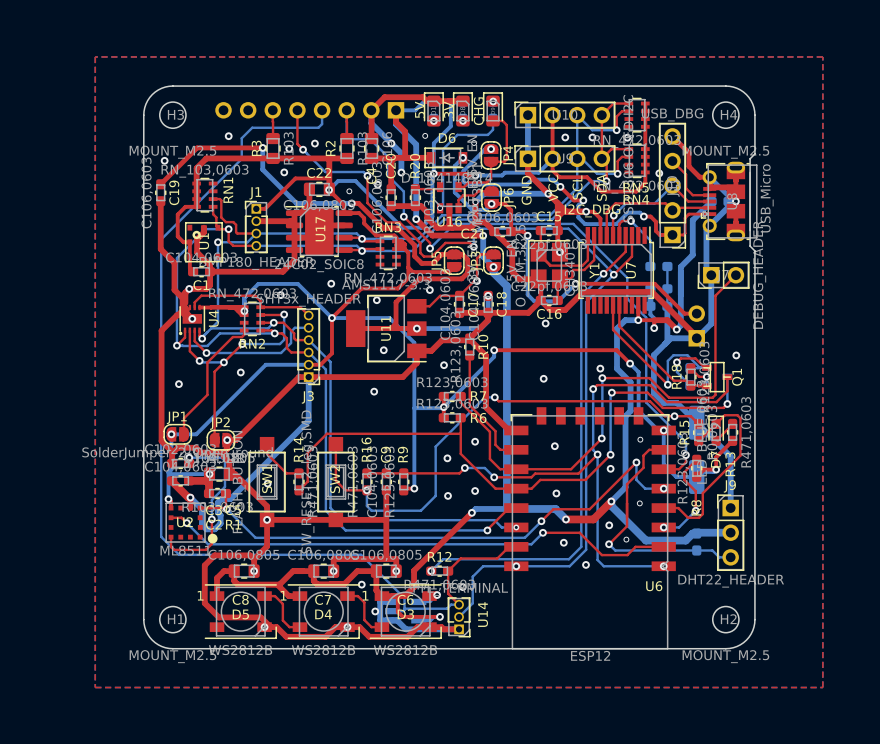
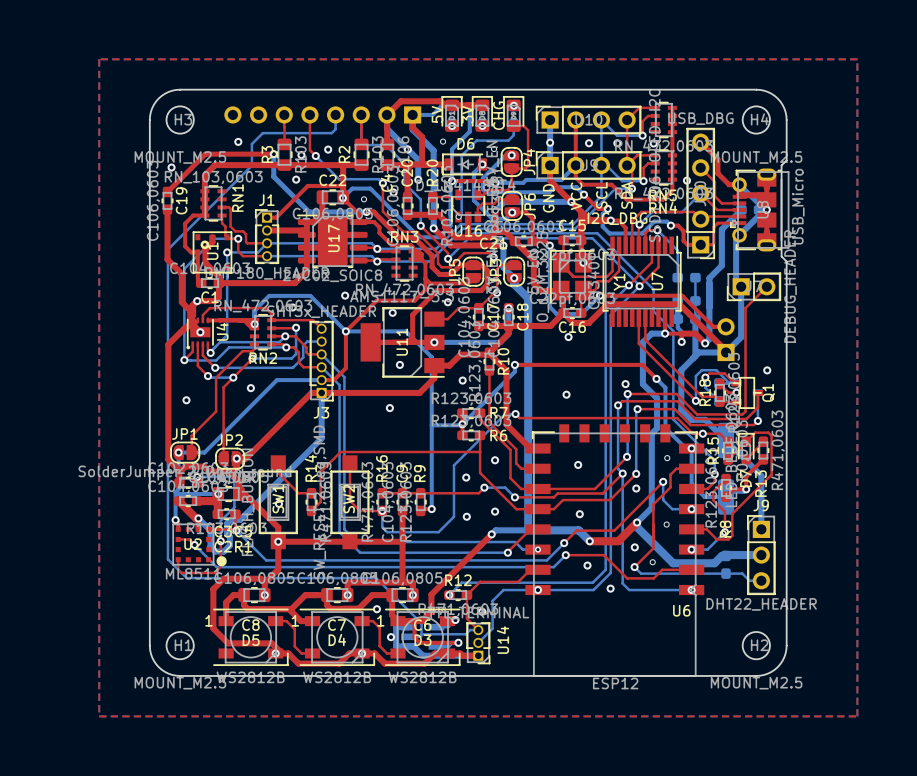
via: none -> (550, 142)

